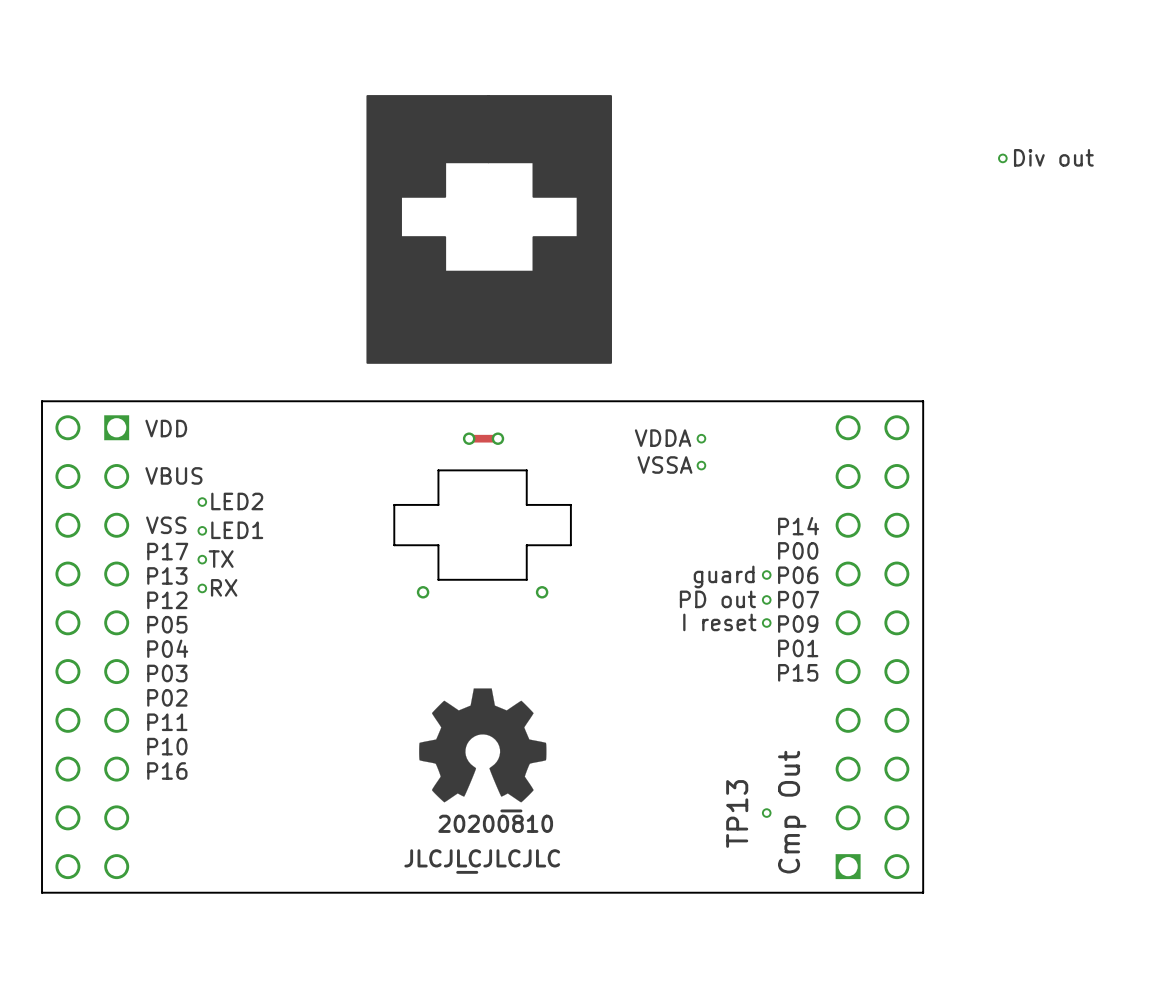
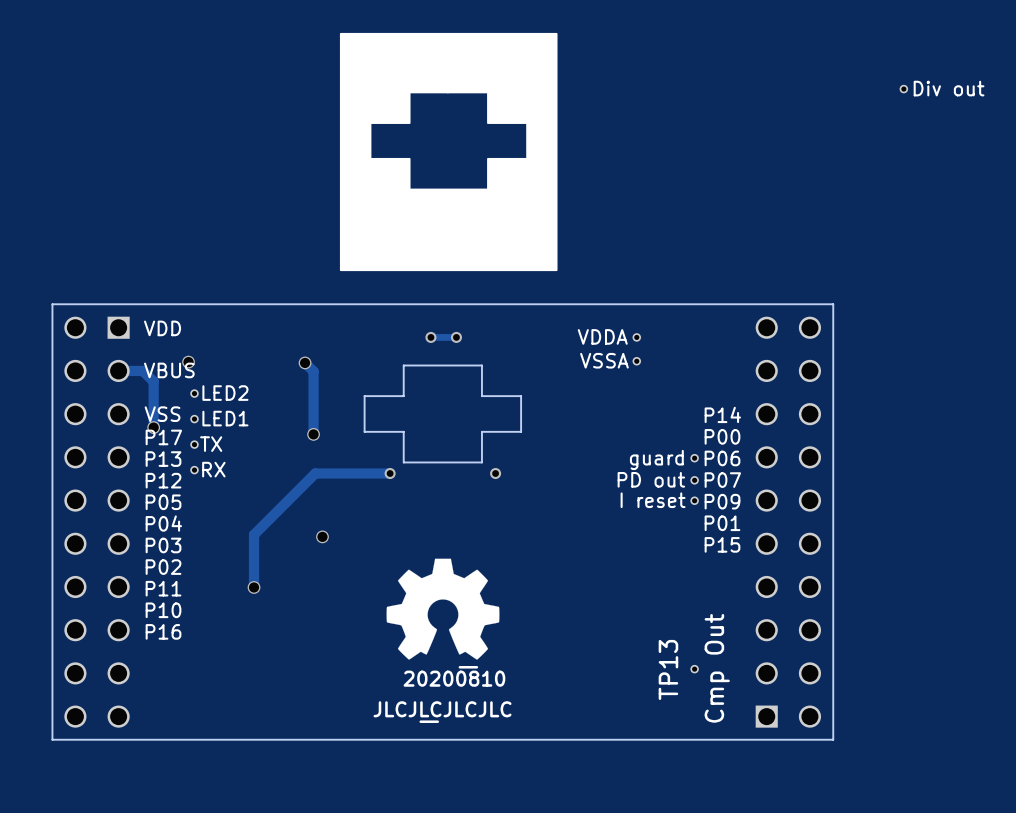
via: none -> (188, 362)
track: none -> (305, 362) (313, 371) (313, 434)
via: none -> (305, 362)
track: none -> (118, 370) (142, 370) (153, 381) (153, 427)
via: none -> (153, 427)
via: none -> (313, 434)
track: none -> (390, 473) (315, 473) (254, 534) (254, 587)
via: none -> (322, 536)
via: none -> (254, 587)

